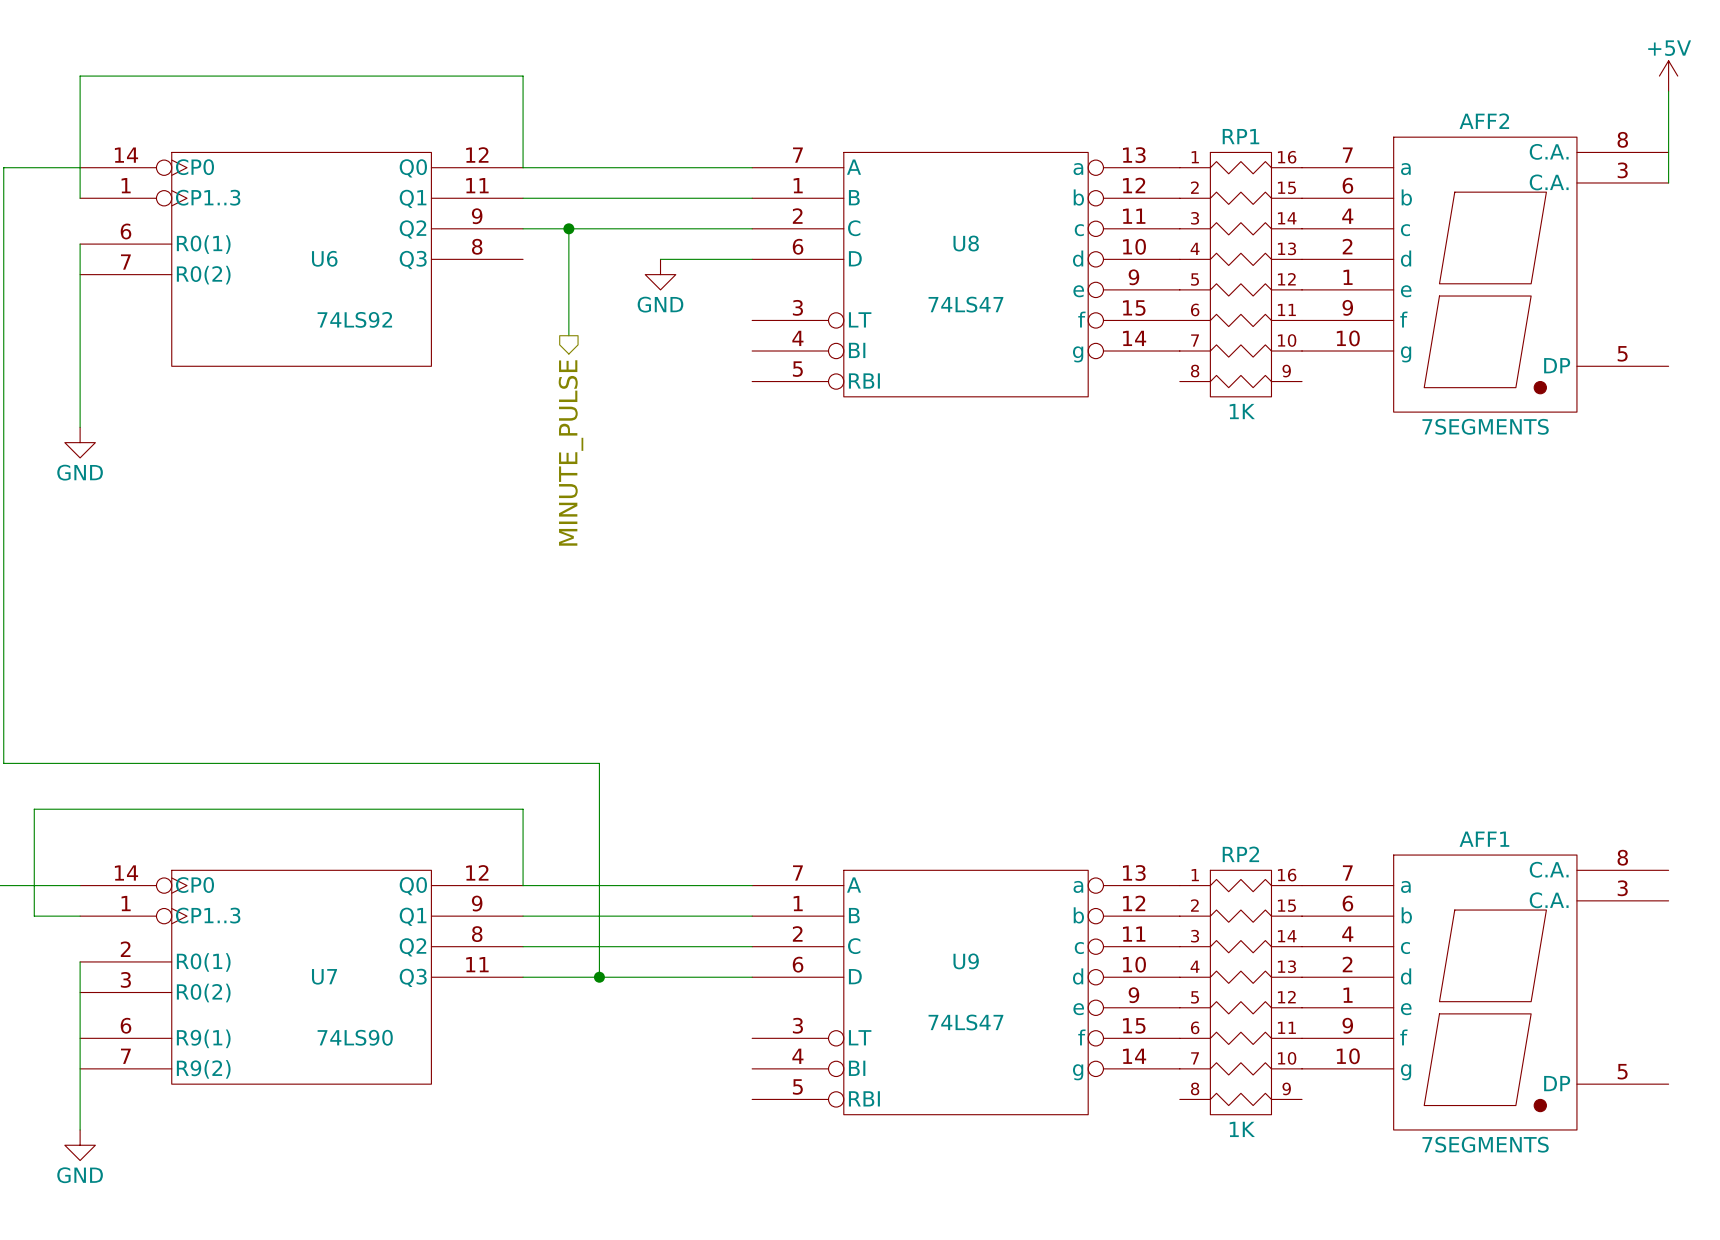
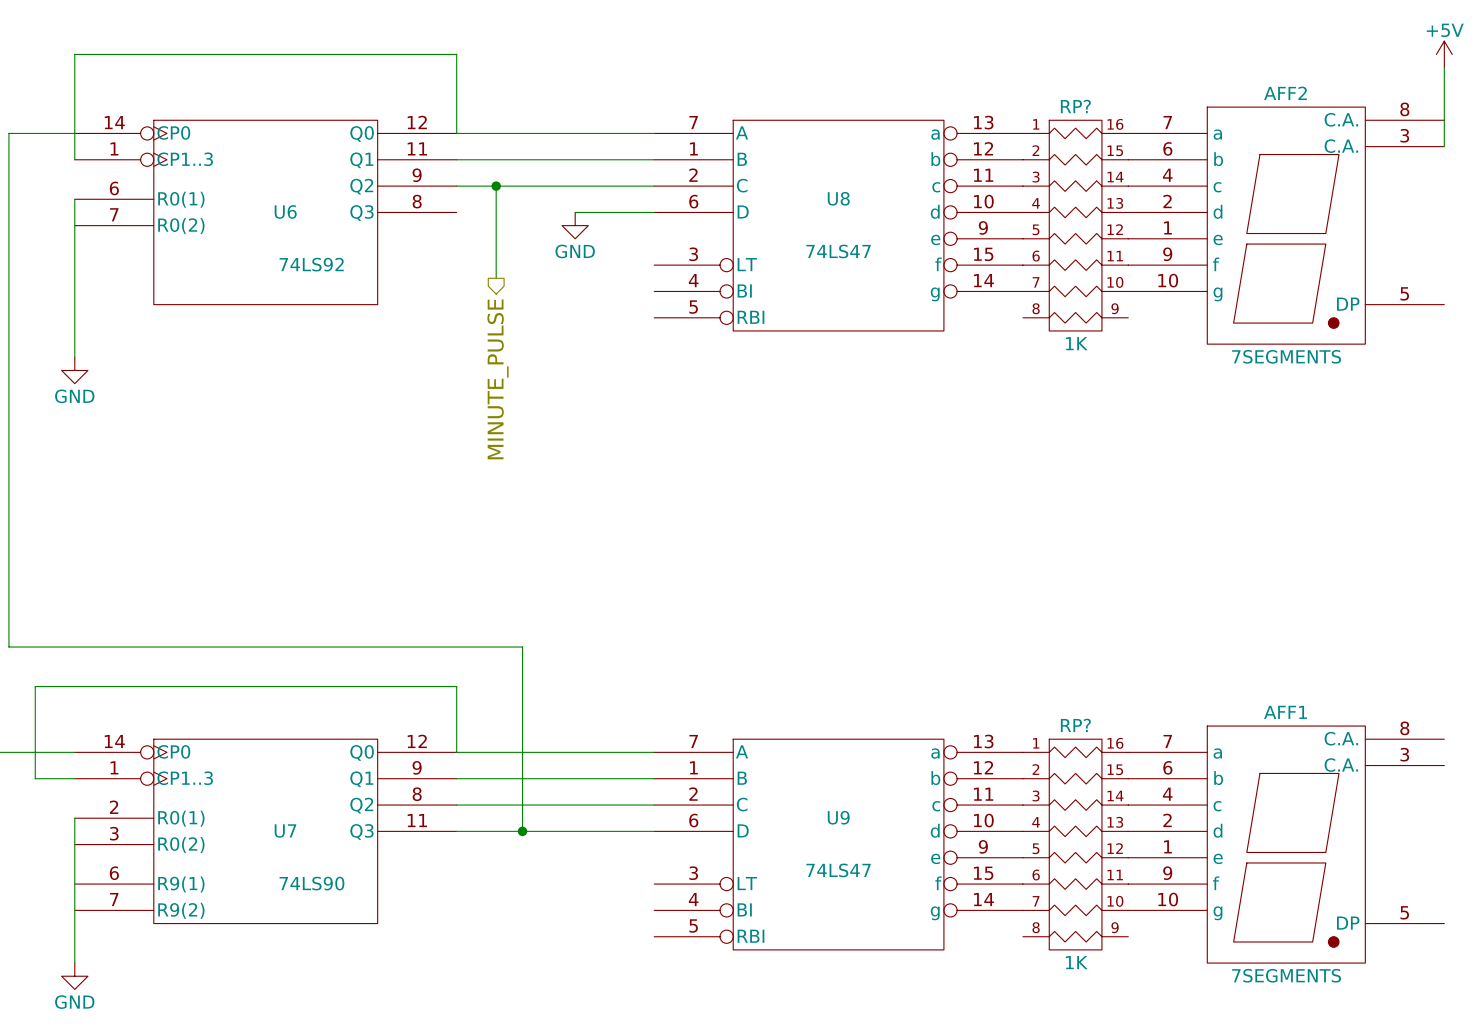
RP1 name: RP1 (1240, 136) -> RP? (1075, 106)
RP2 name: RP2 (1240, 854) -> RP? (1075, 725)

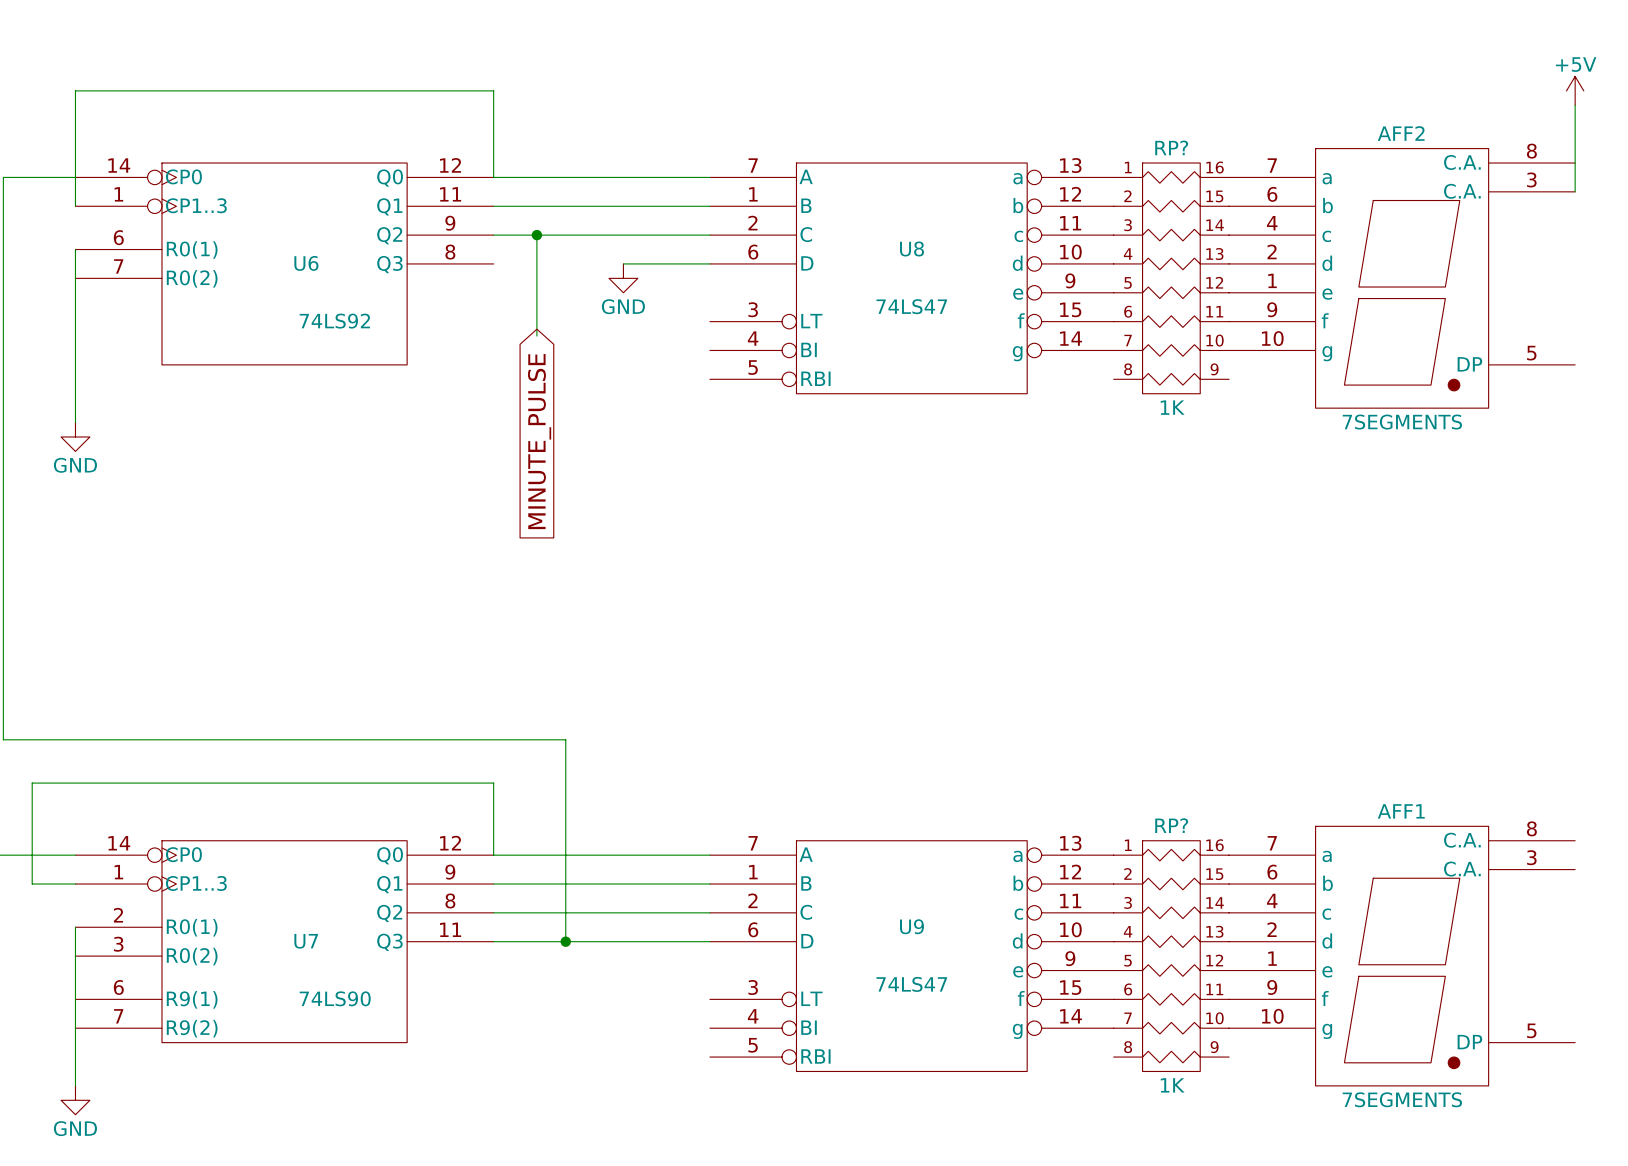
global label: none -> MINUTE_PULSE (539, 441)
hierarchical label: MINUTE_PULSE (498, 379) -> none

